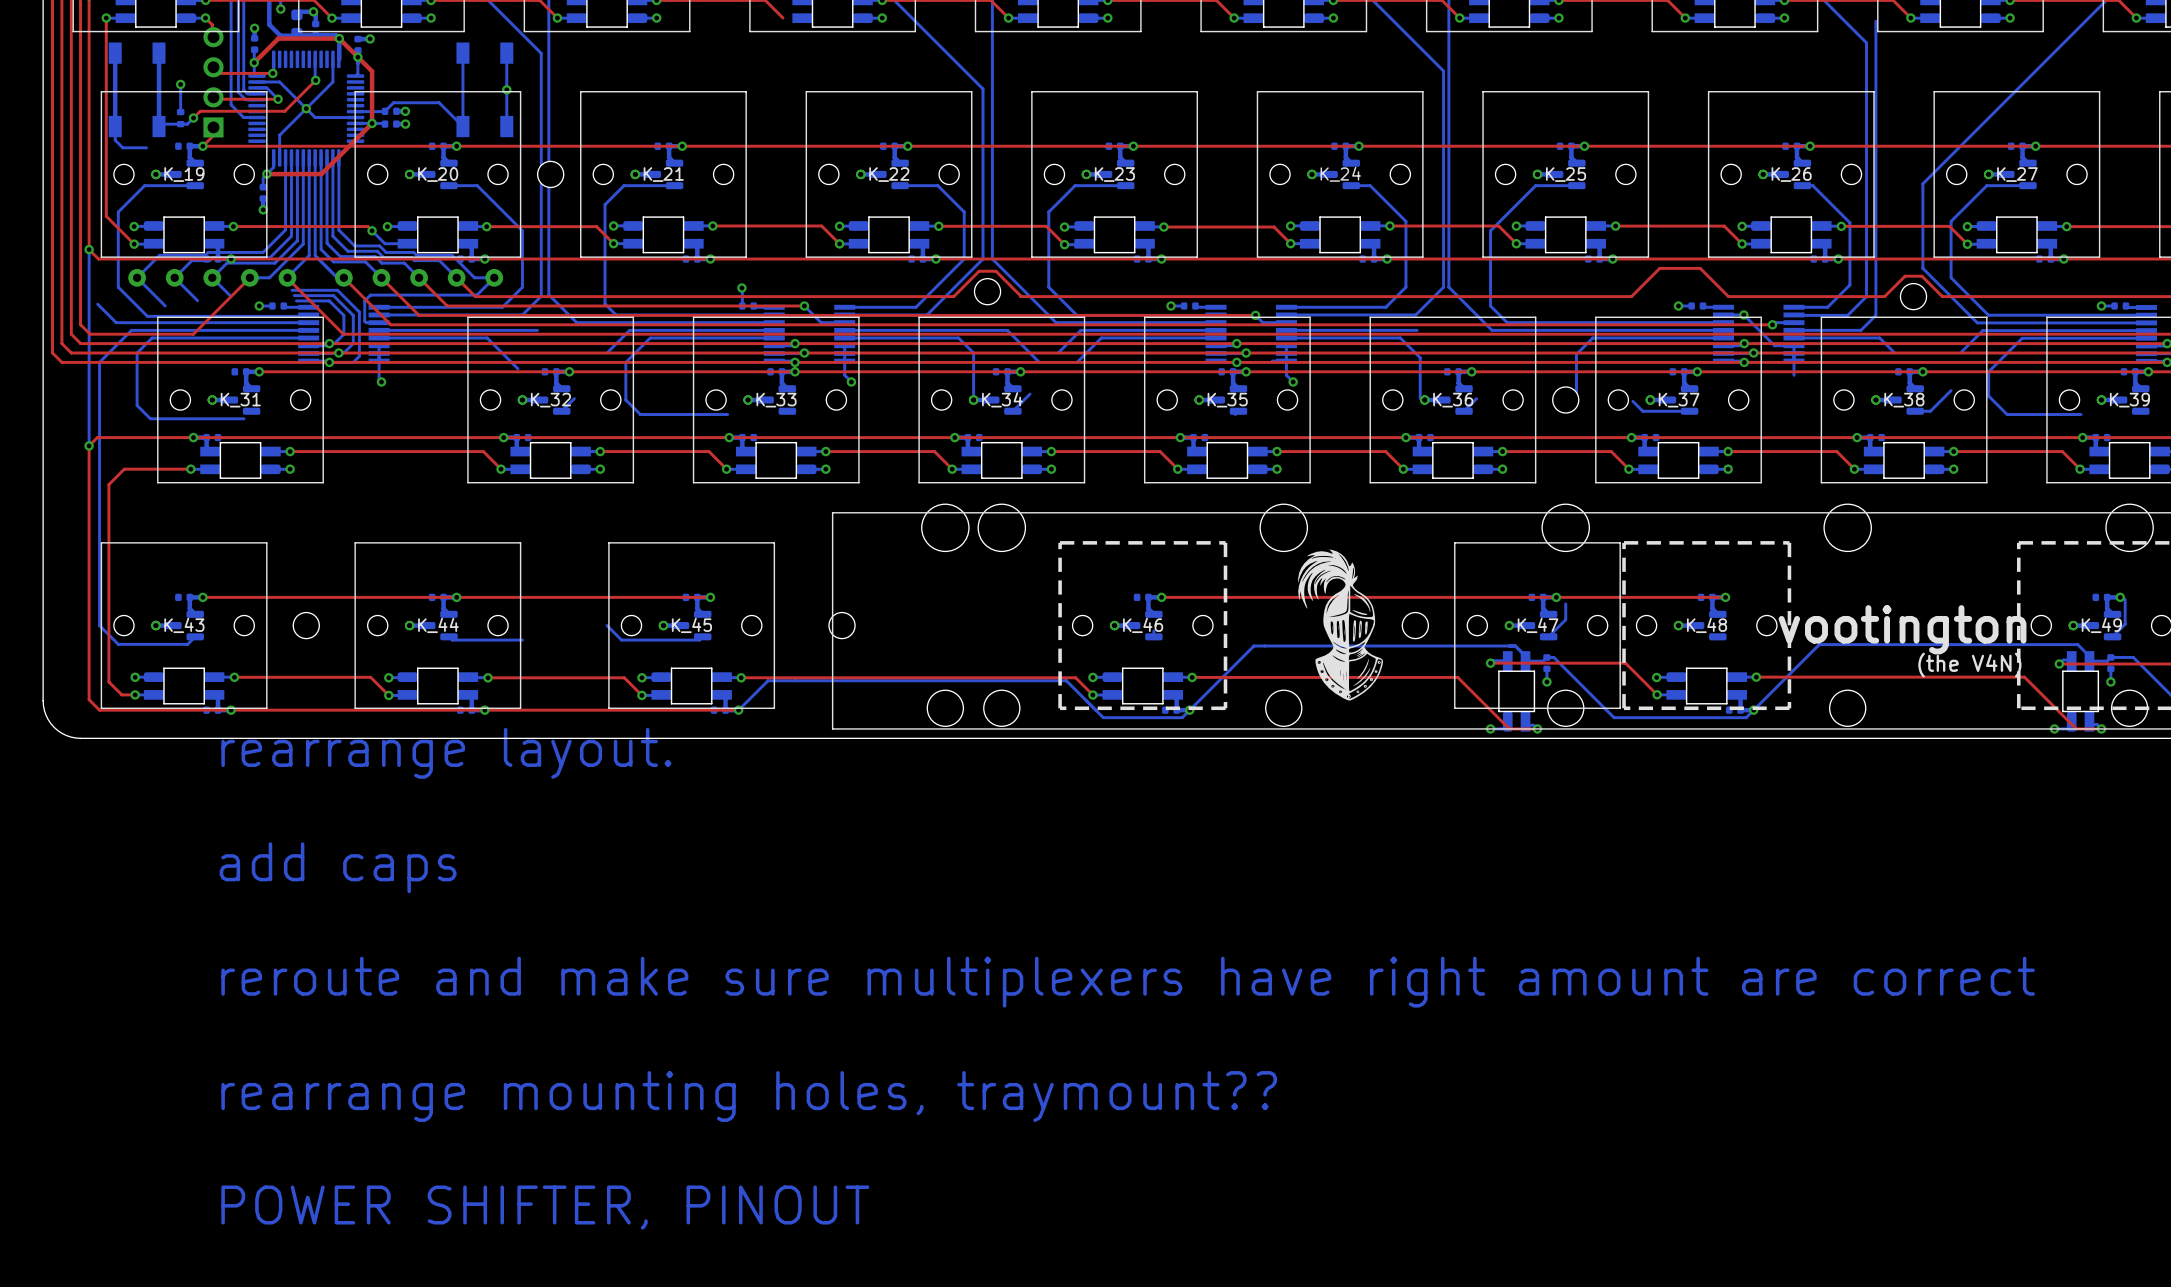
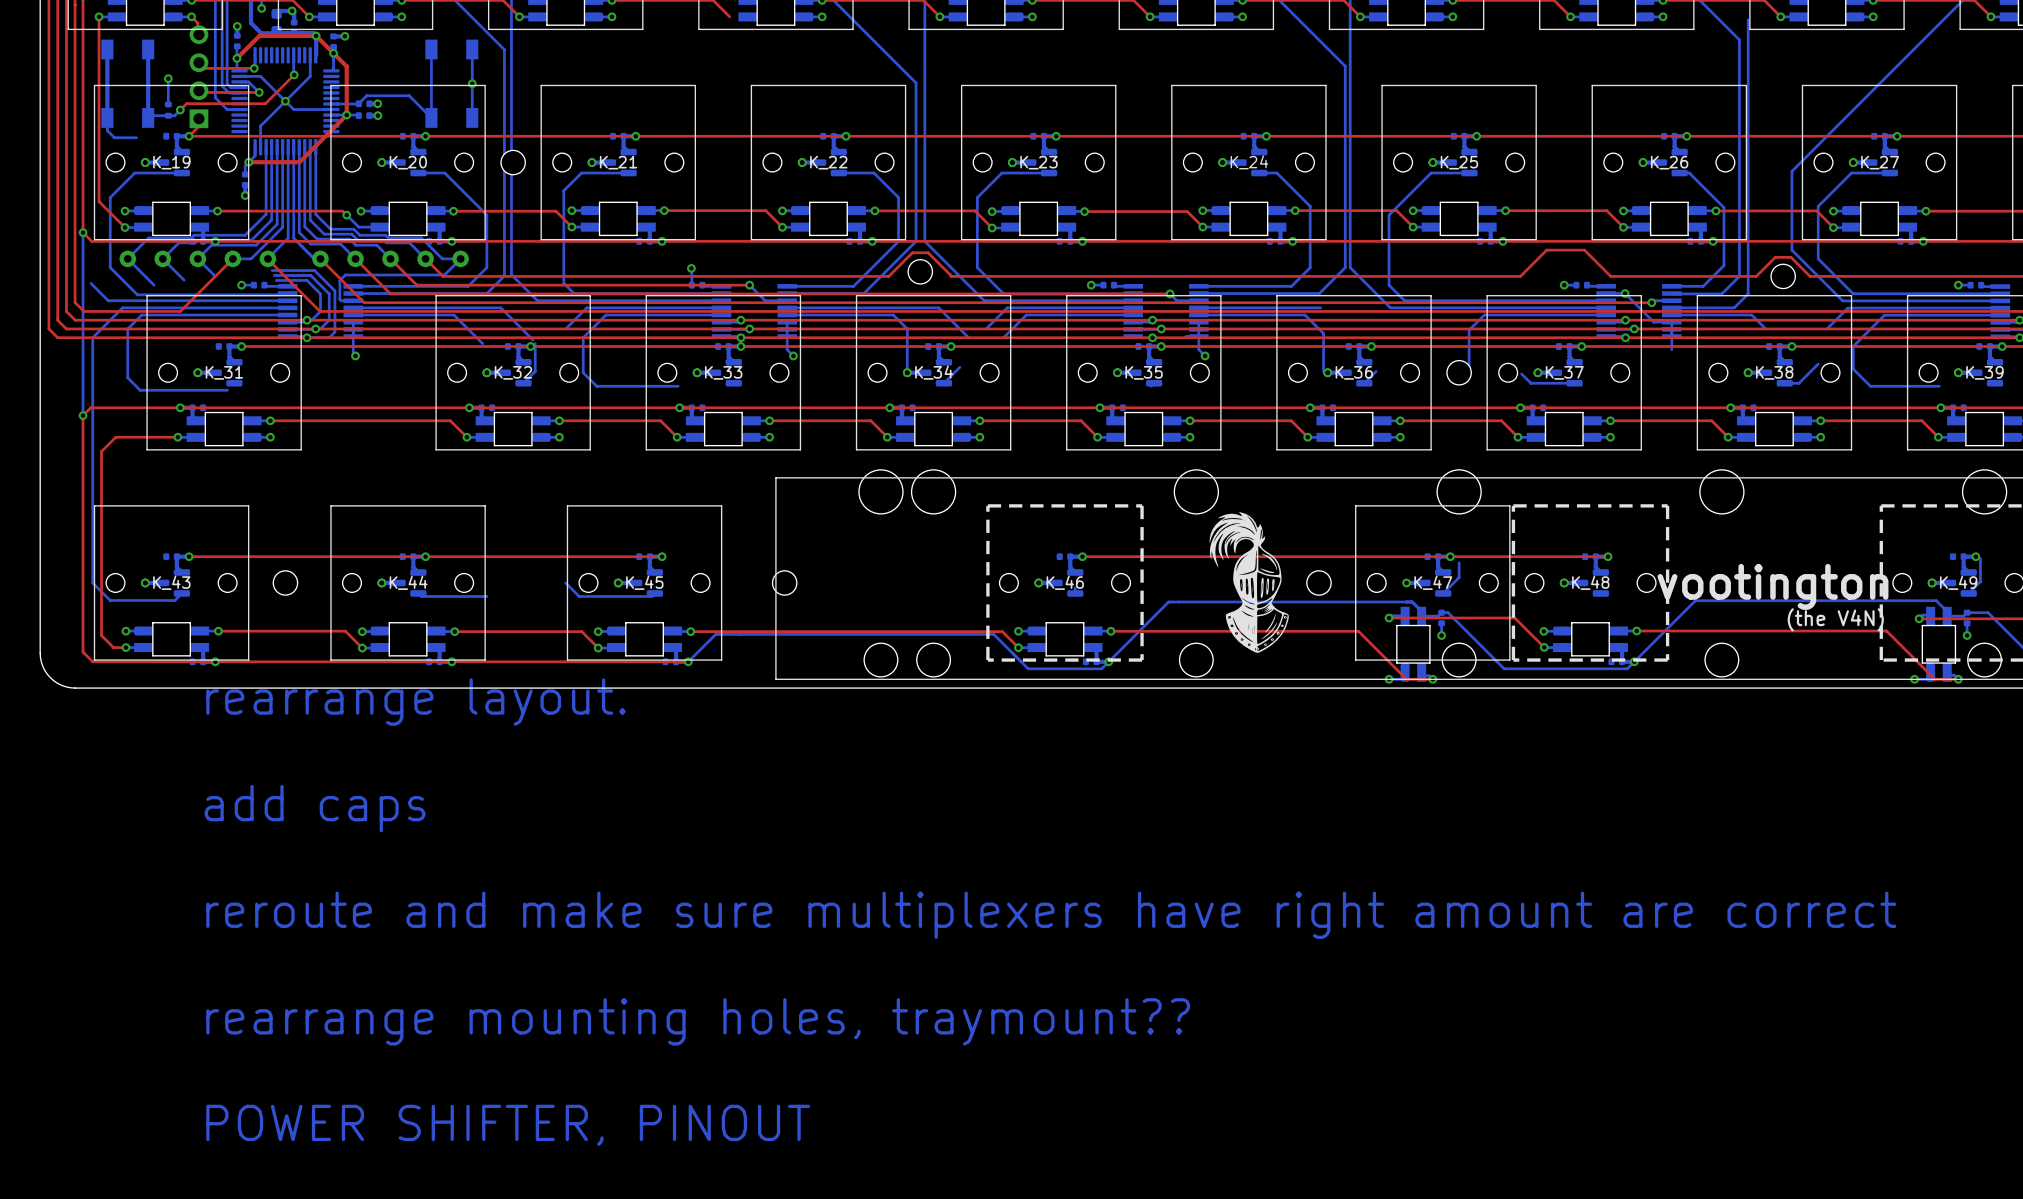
bottom track: none -> (500, 307) (533, 340)
bottom track: none -> (535, 343) (535, 371)

